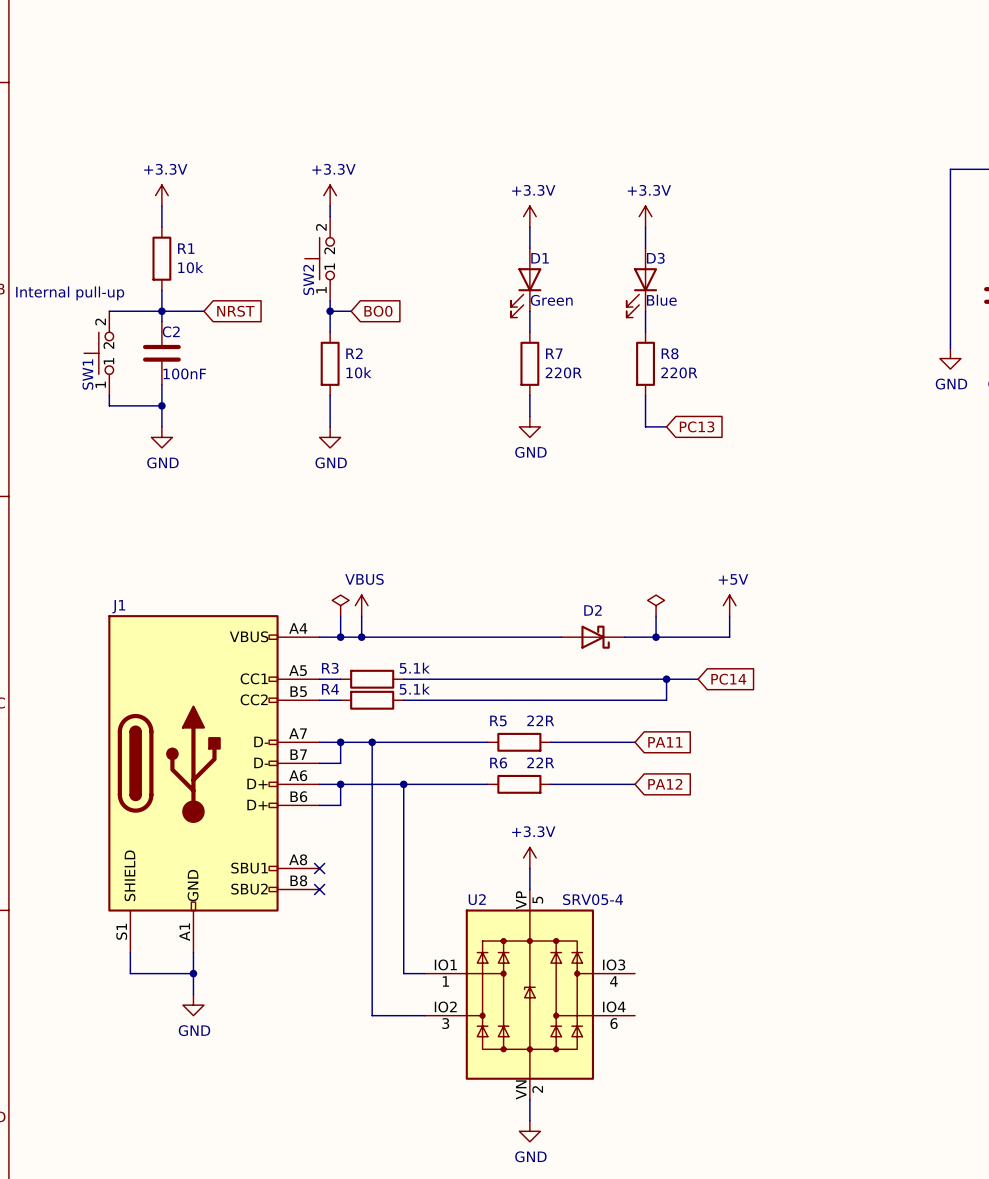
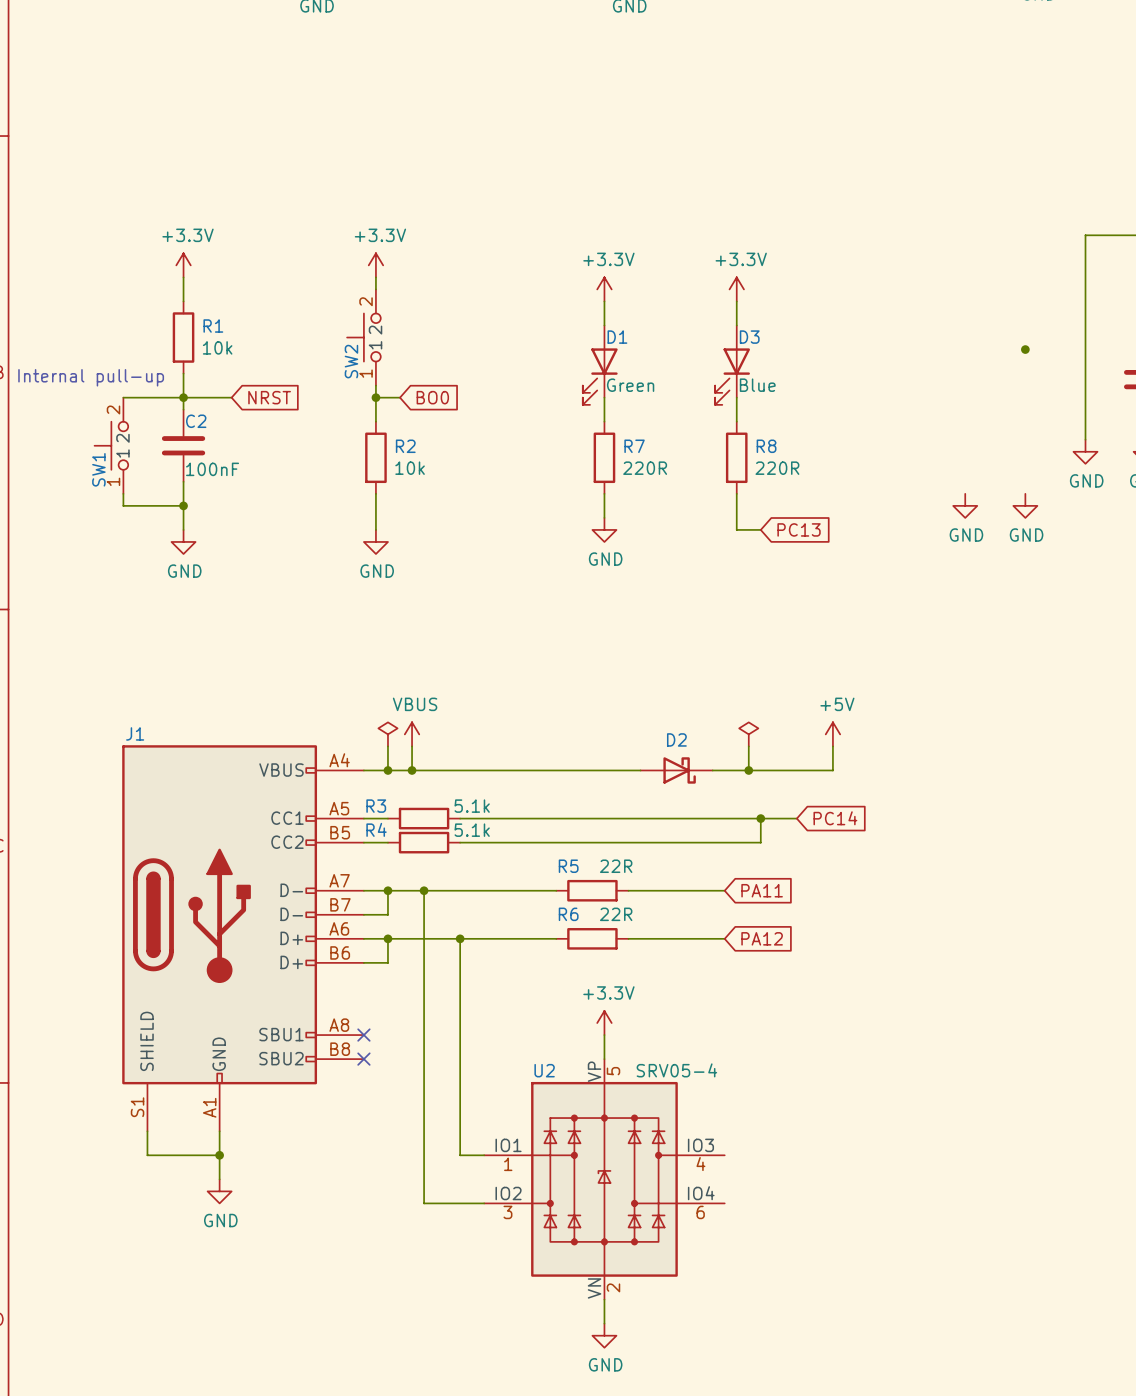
junction: none -> (1025, 349)
power symbol: none -> GND (965, 505)
power symbol: none -> GND (1025, 505)

